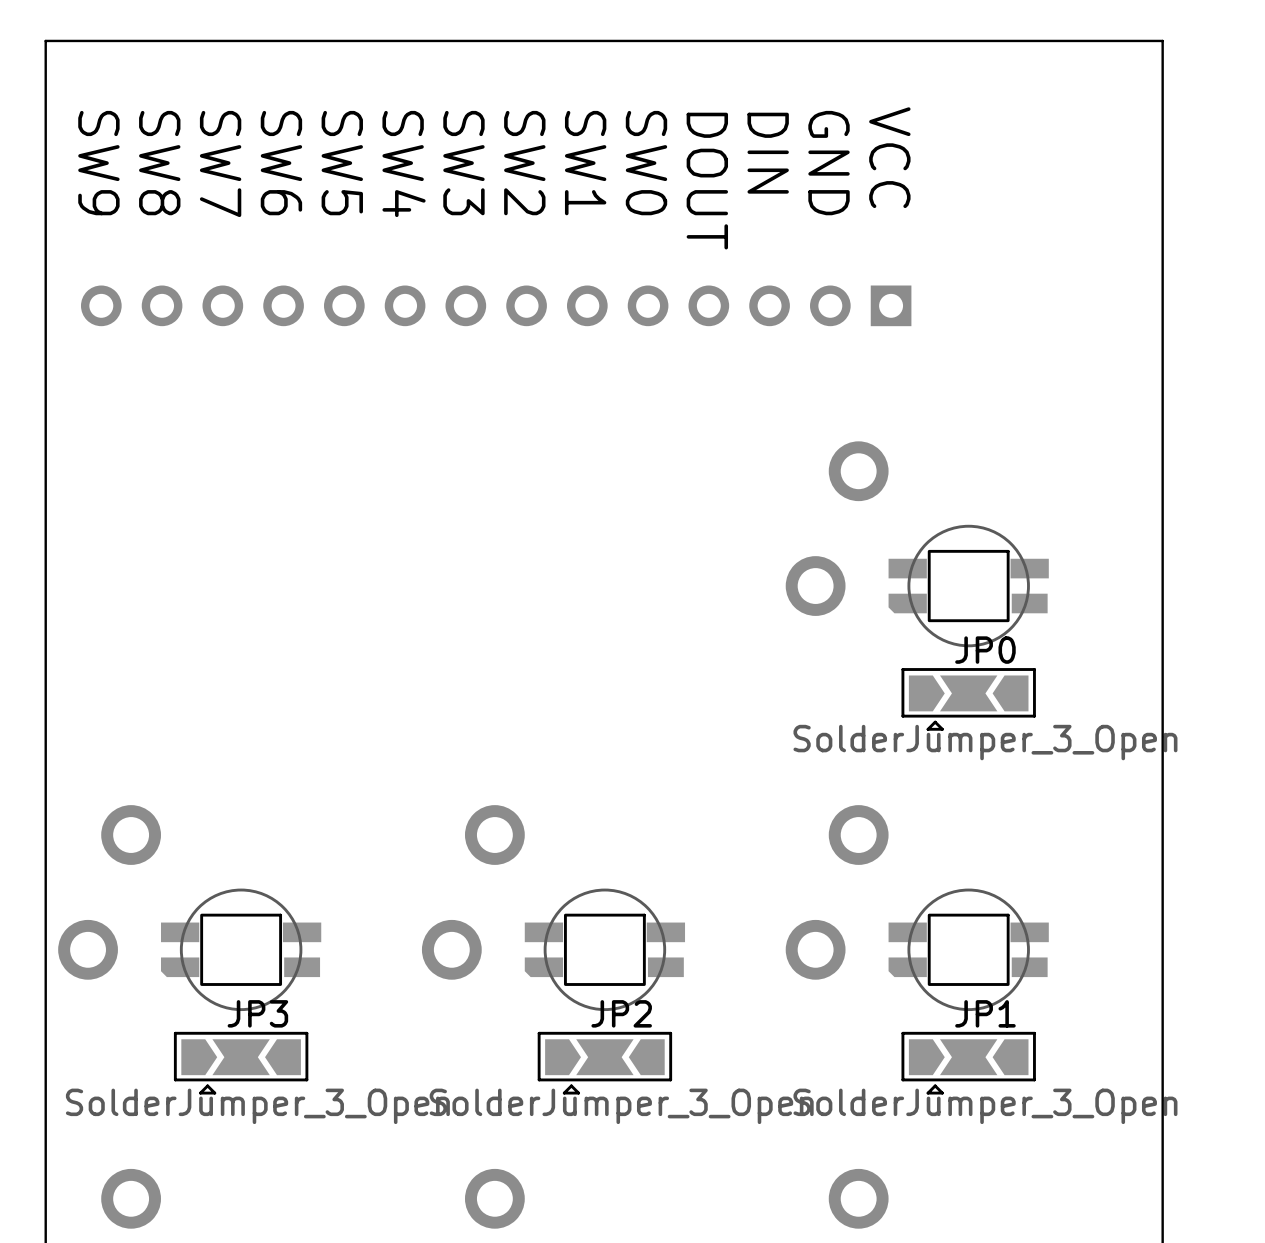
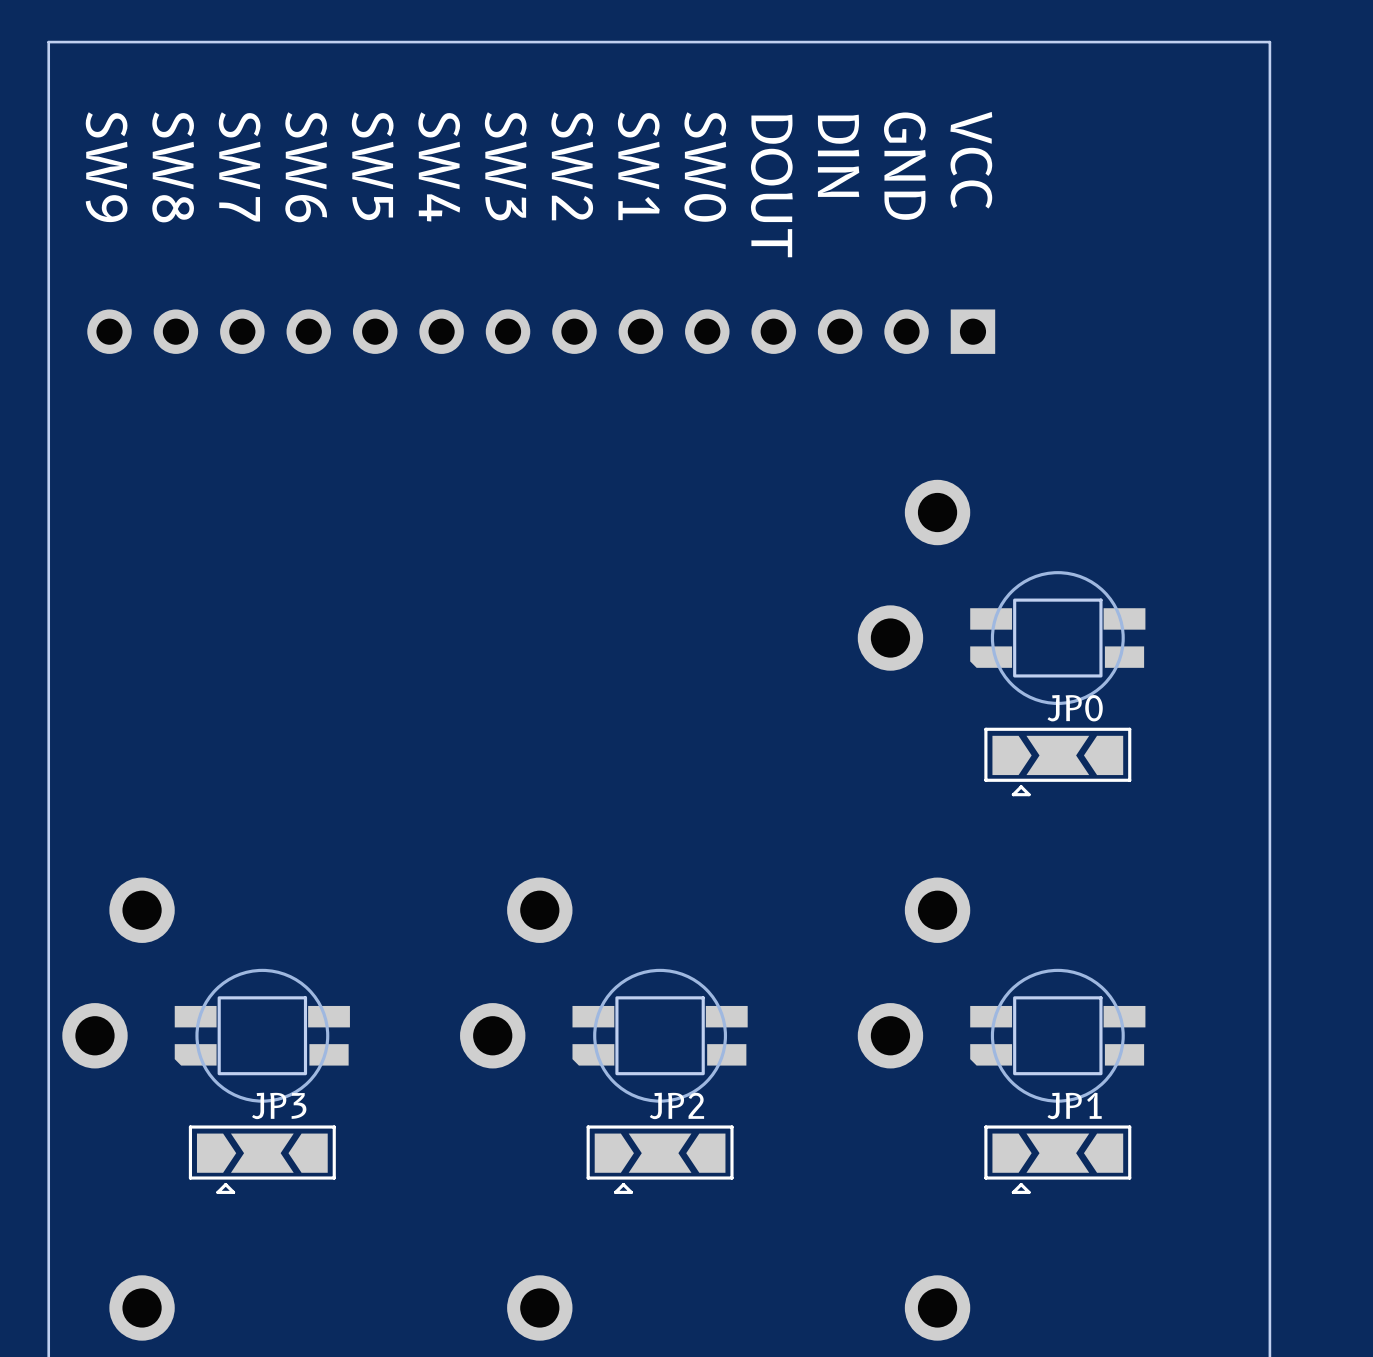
JP0 value: SolderJumper_3_Open (985, 742) -> none
JP3 value: SolderJumper_3_Open (257, 1106) -> none
JP2 value: SolderJumper_3_Open (621, 1106) -> none
JP1 value: SolderJumper_3_Open (985, 1106) -> none

